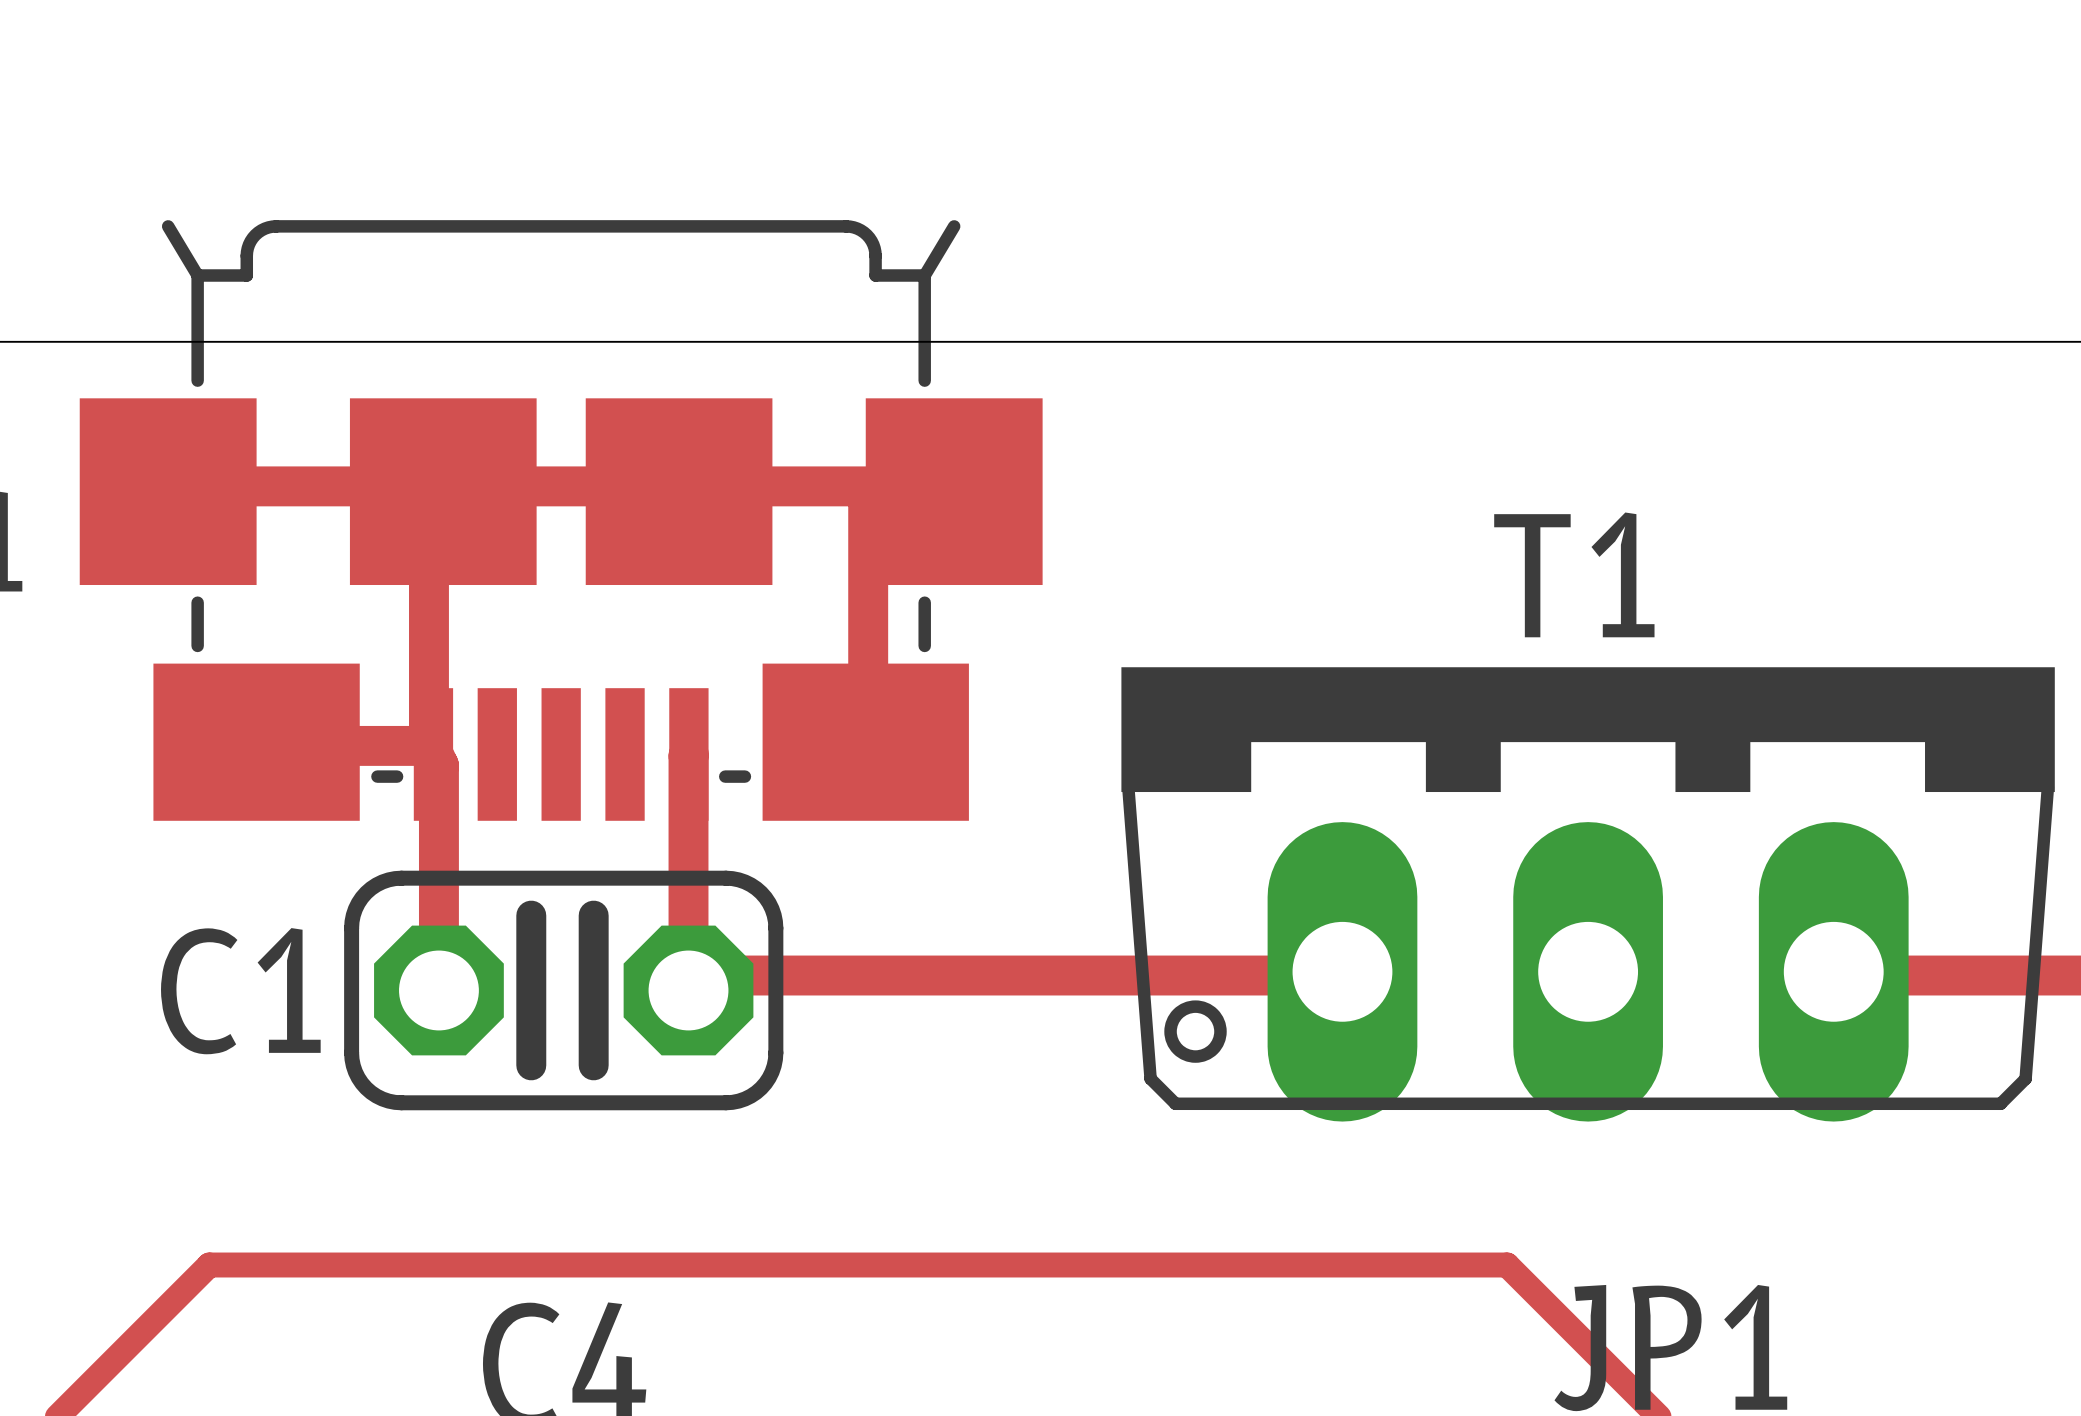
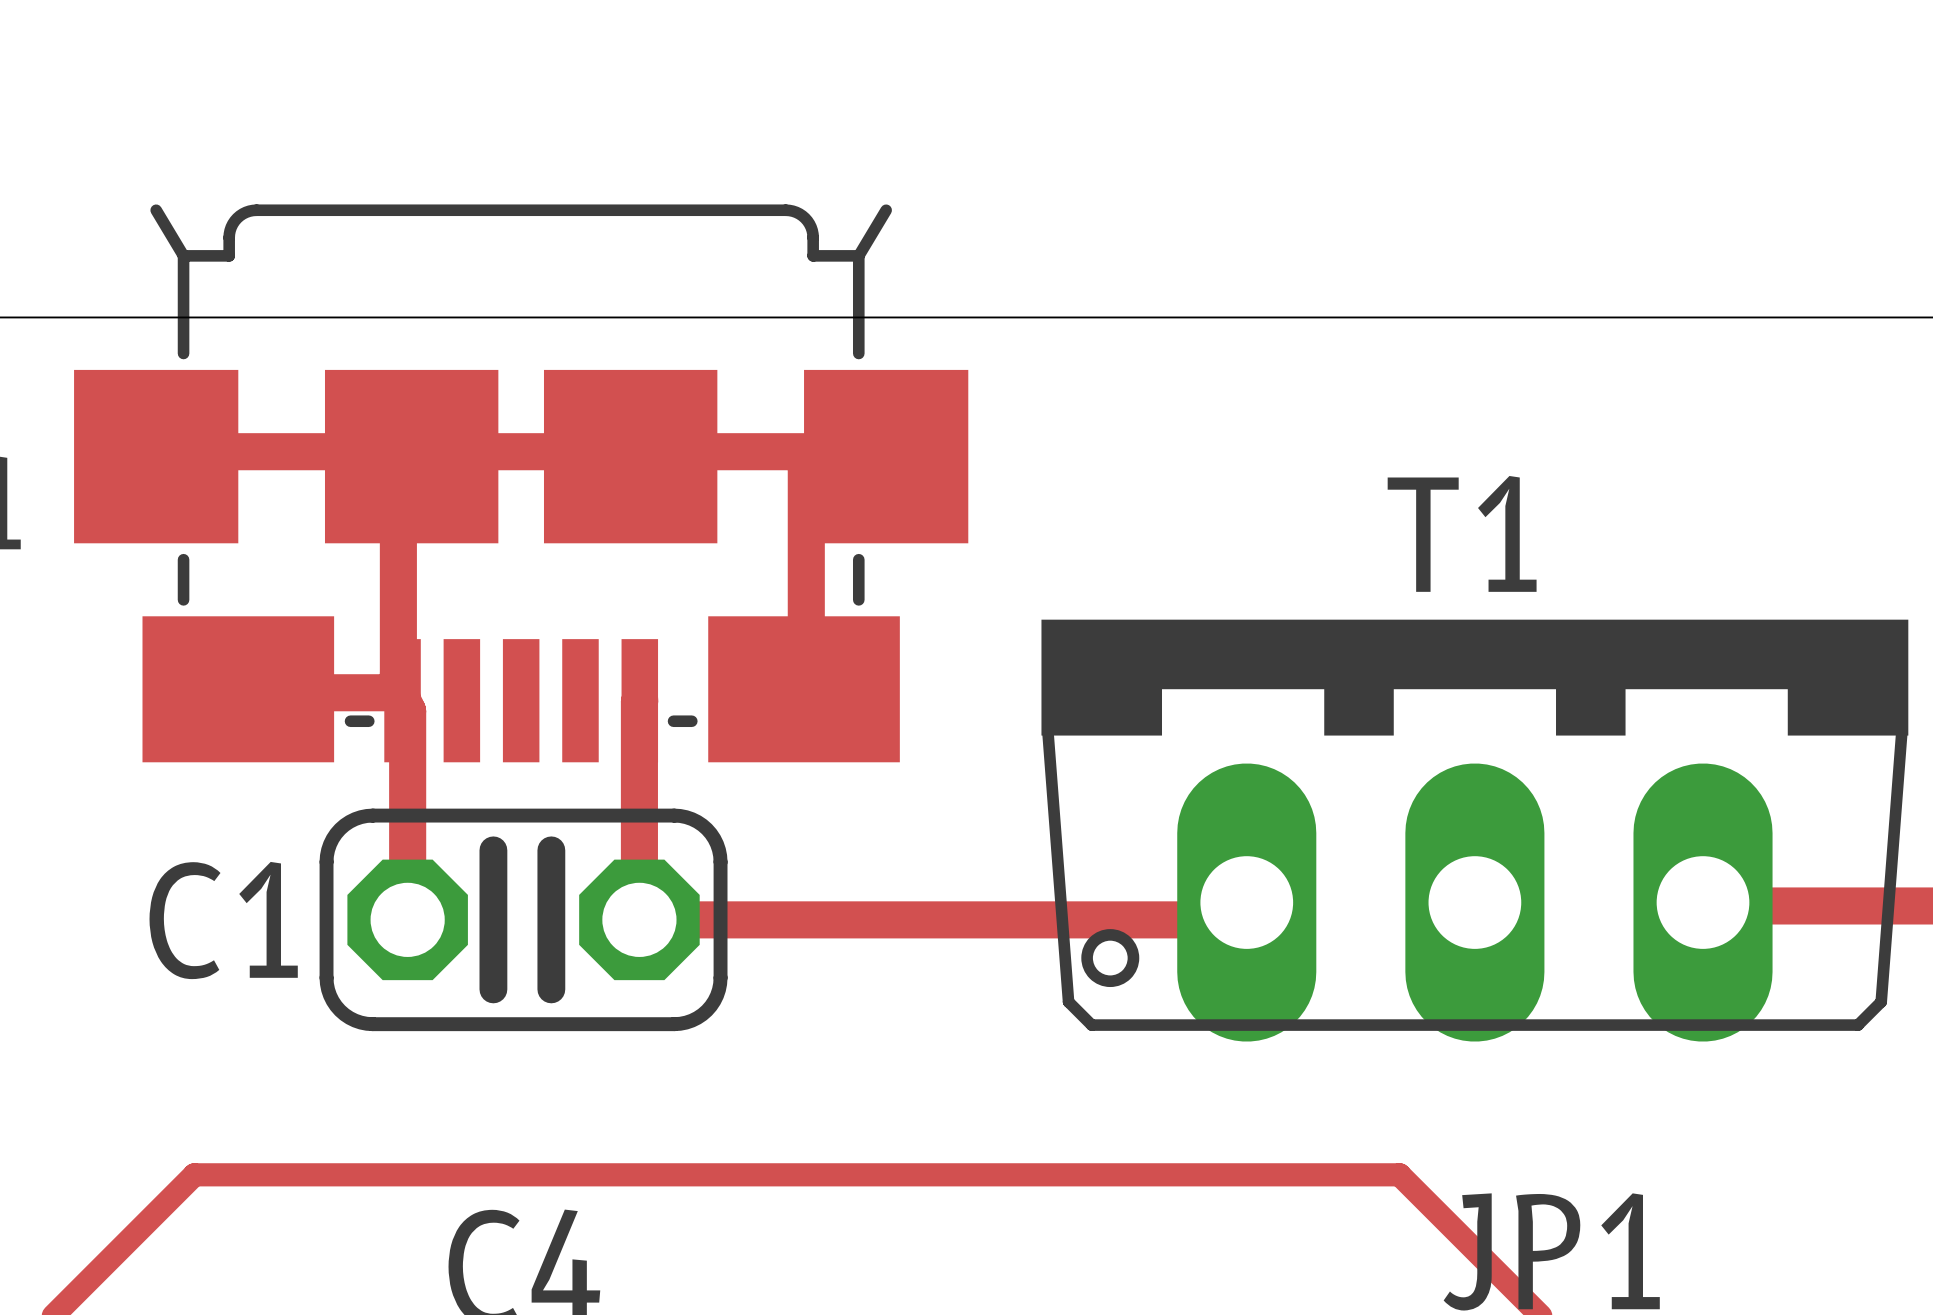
track: (1337, 975) (698, 975) (688, 990) -> (1246, 902) (1246, 919) (639, 919)

